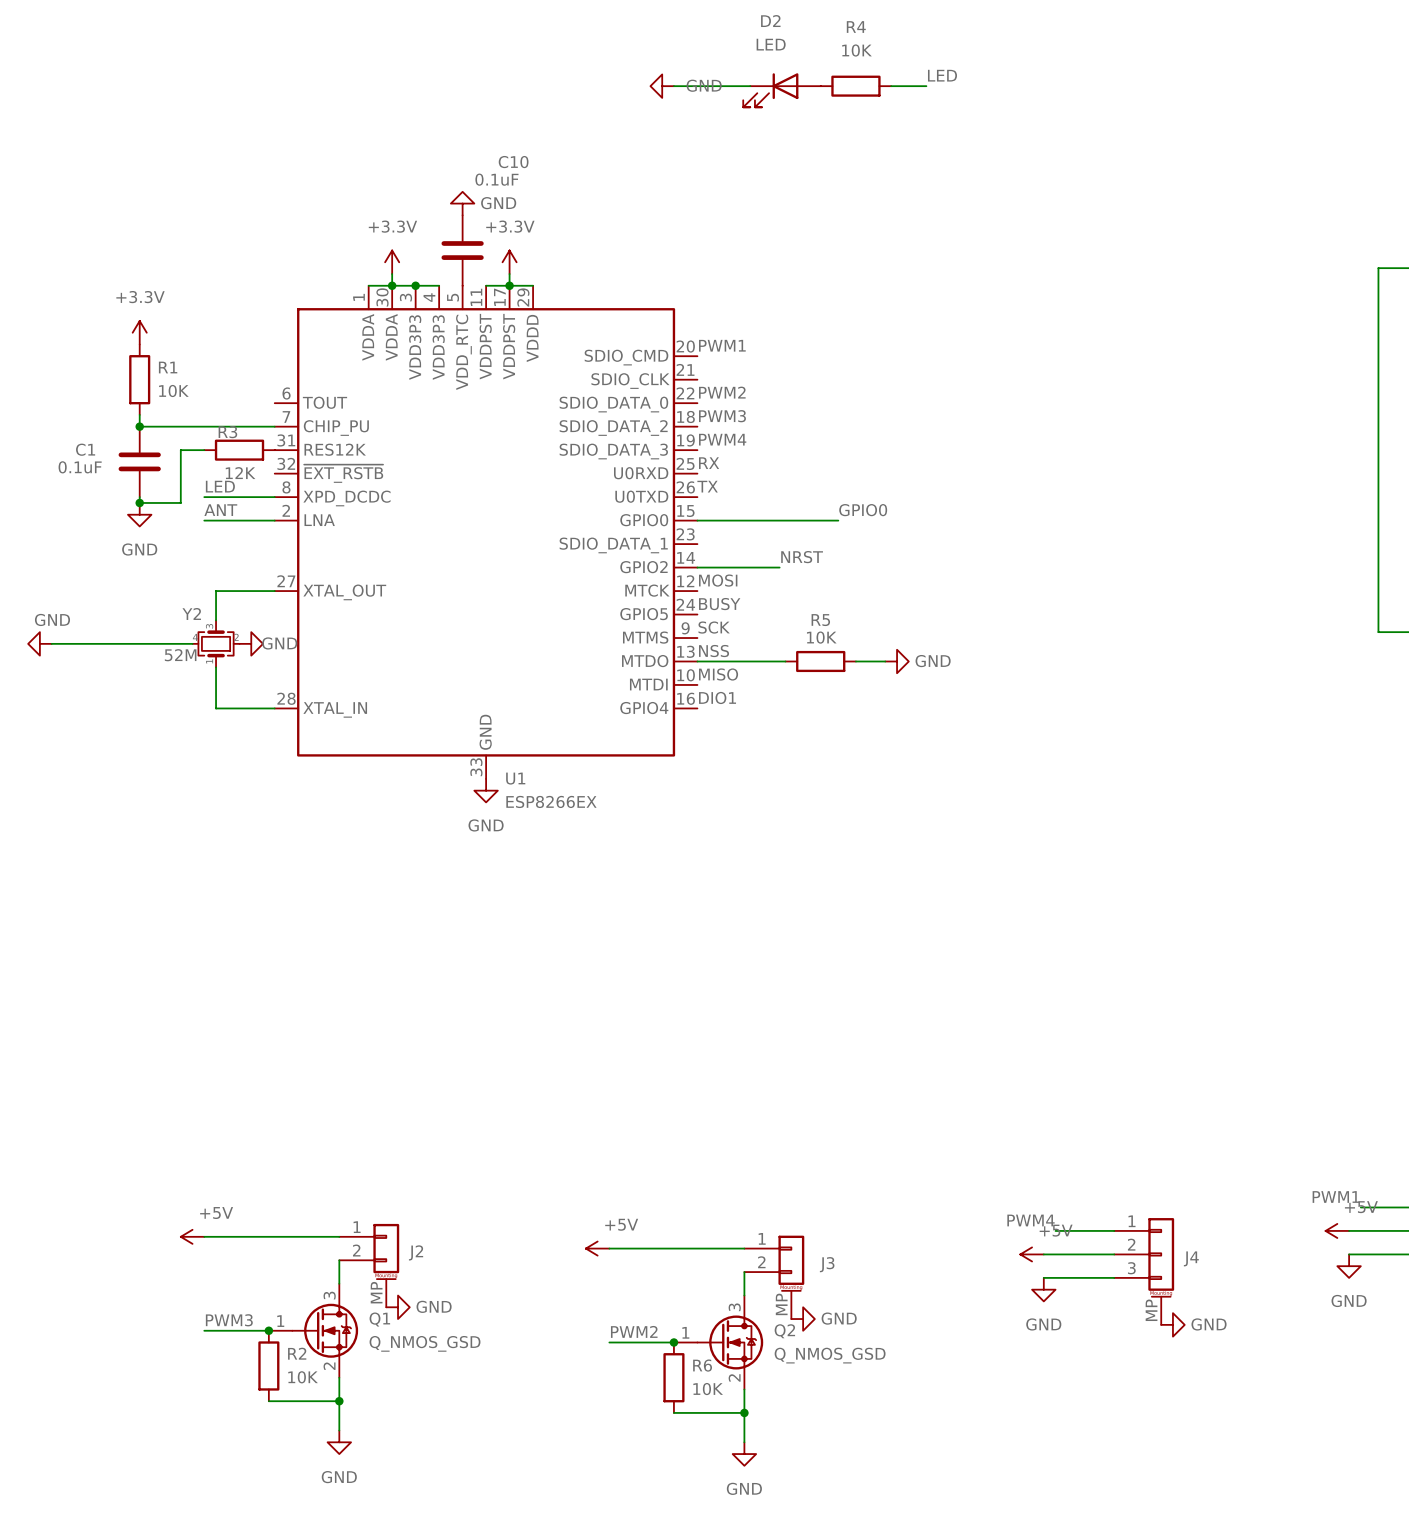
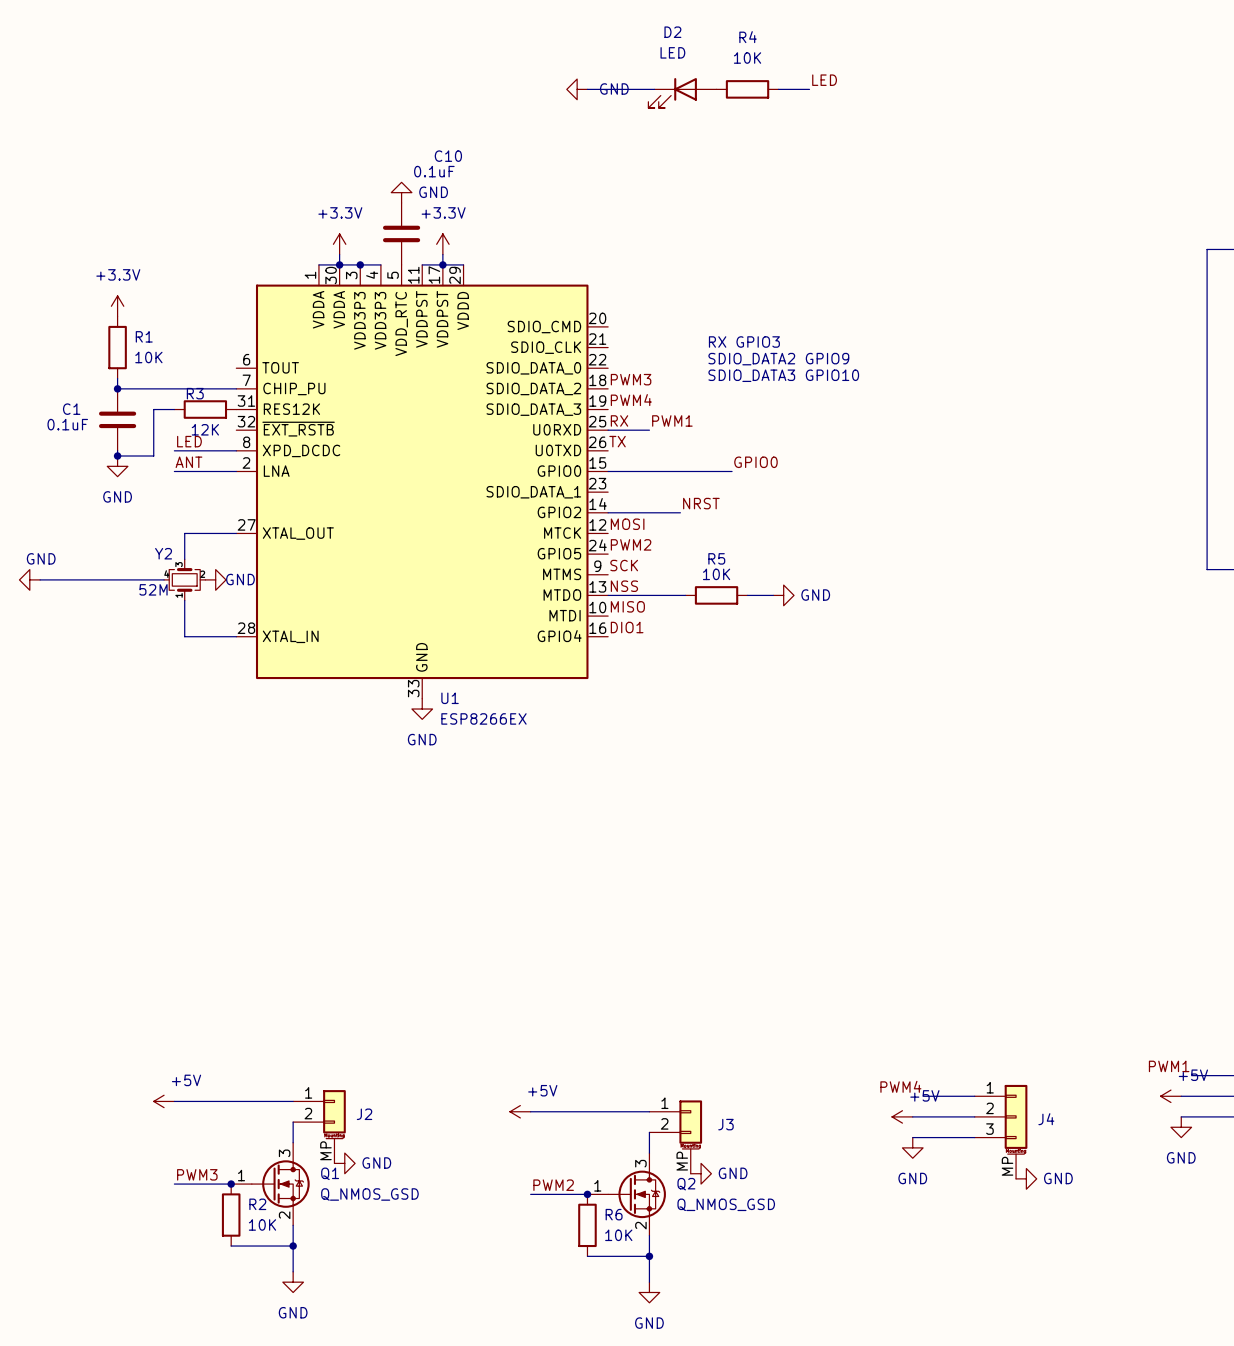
label position: PWM1 (722, 345) -> PWM1 (672, 420)
text: none -> RX GPIO3 (744, 342)
label: PWM2 (722, 392) -> none
text: none -> SDIO_DATA2 GPIO9 (778, 359)
text: none -> SDIO_DATA3 GPIO10 (783, 375)
wire: none -> (608, 430) (649, 430)
label: BUSY (719, 604) -> PWM2 (631, 544)

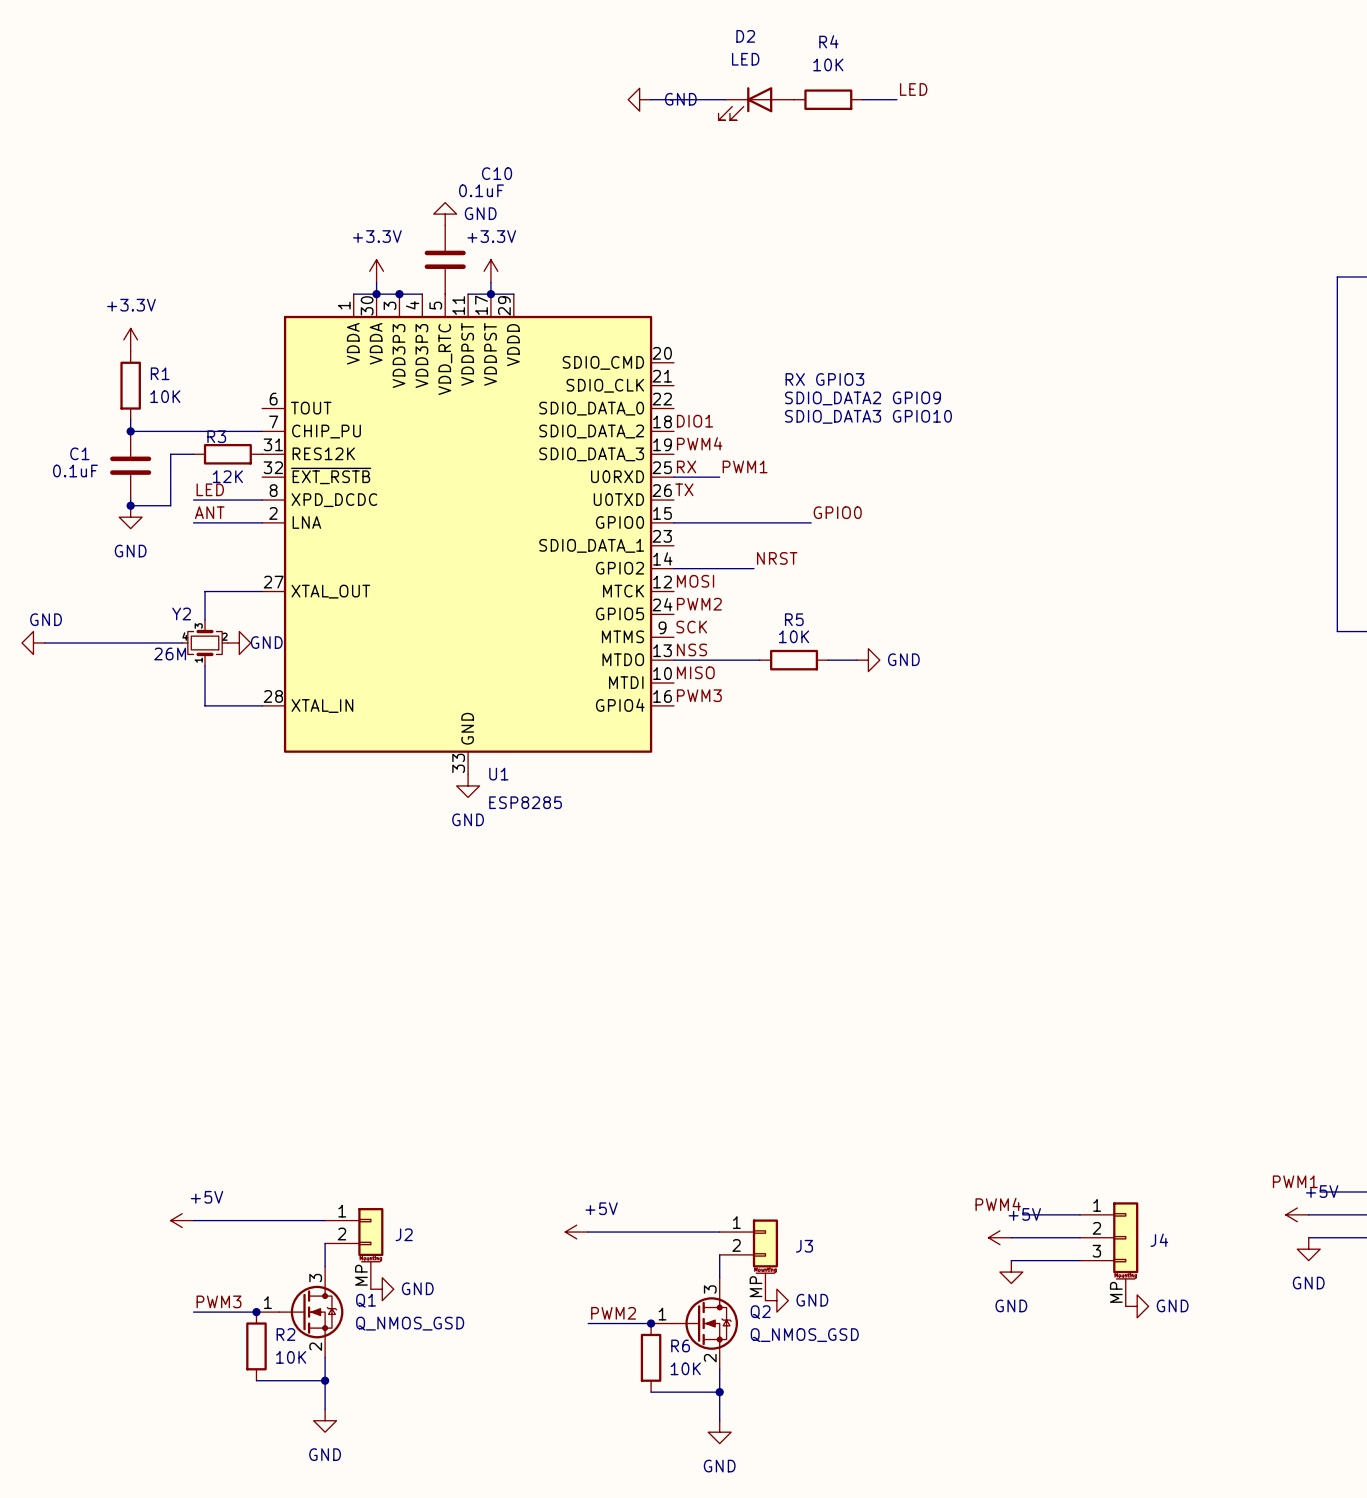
label: PWM3 (631, 379) -> DIO1 (695, 421)
Y2 value: 52M (153, 589) -> 26M (170, 654)
label: DIO1 (627, 627) -> PWM3 (699, 695)
U1 value: ESP8266EX (483, 718) -> ESP8285 (525, 802)

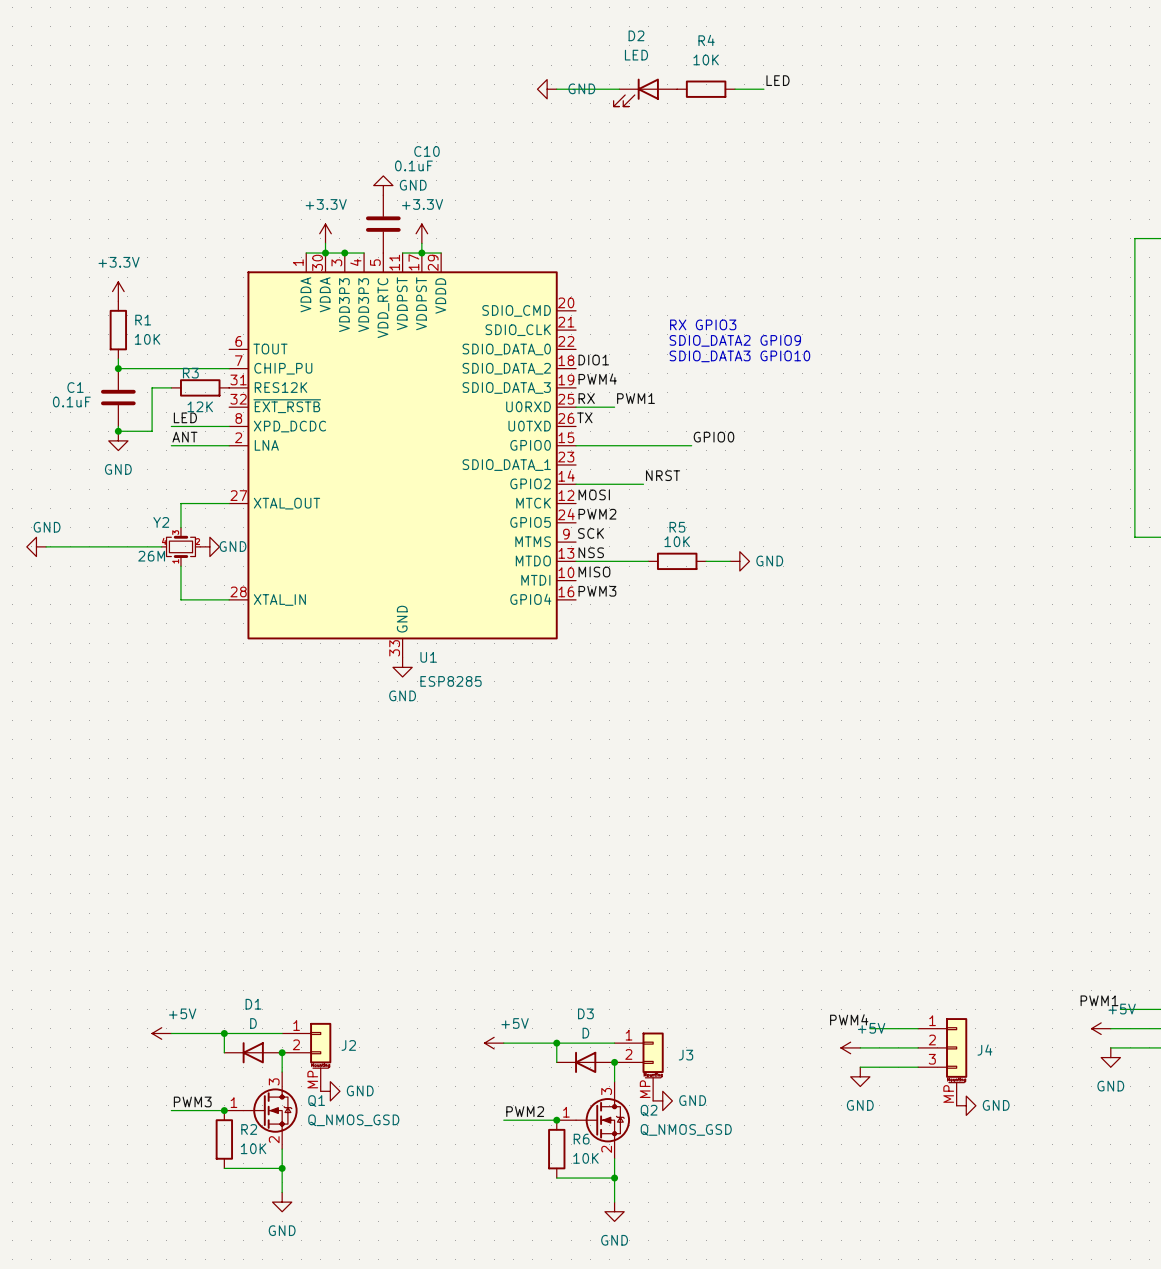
wire: none -> (224, 1033) (224, 1052)
junction: none -> (224, 1033)
wire: none -> (556, 1043) (556, 1062)
junction: none -> (556, 1043)
D1: none -> D (253, 1052)
junction: none -> (282, 1052)
D3: none -> D (585, 1062)
junction: none -> (614, 1062)

